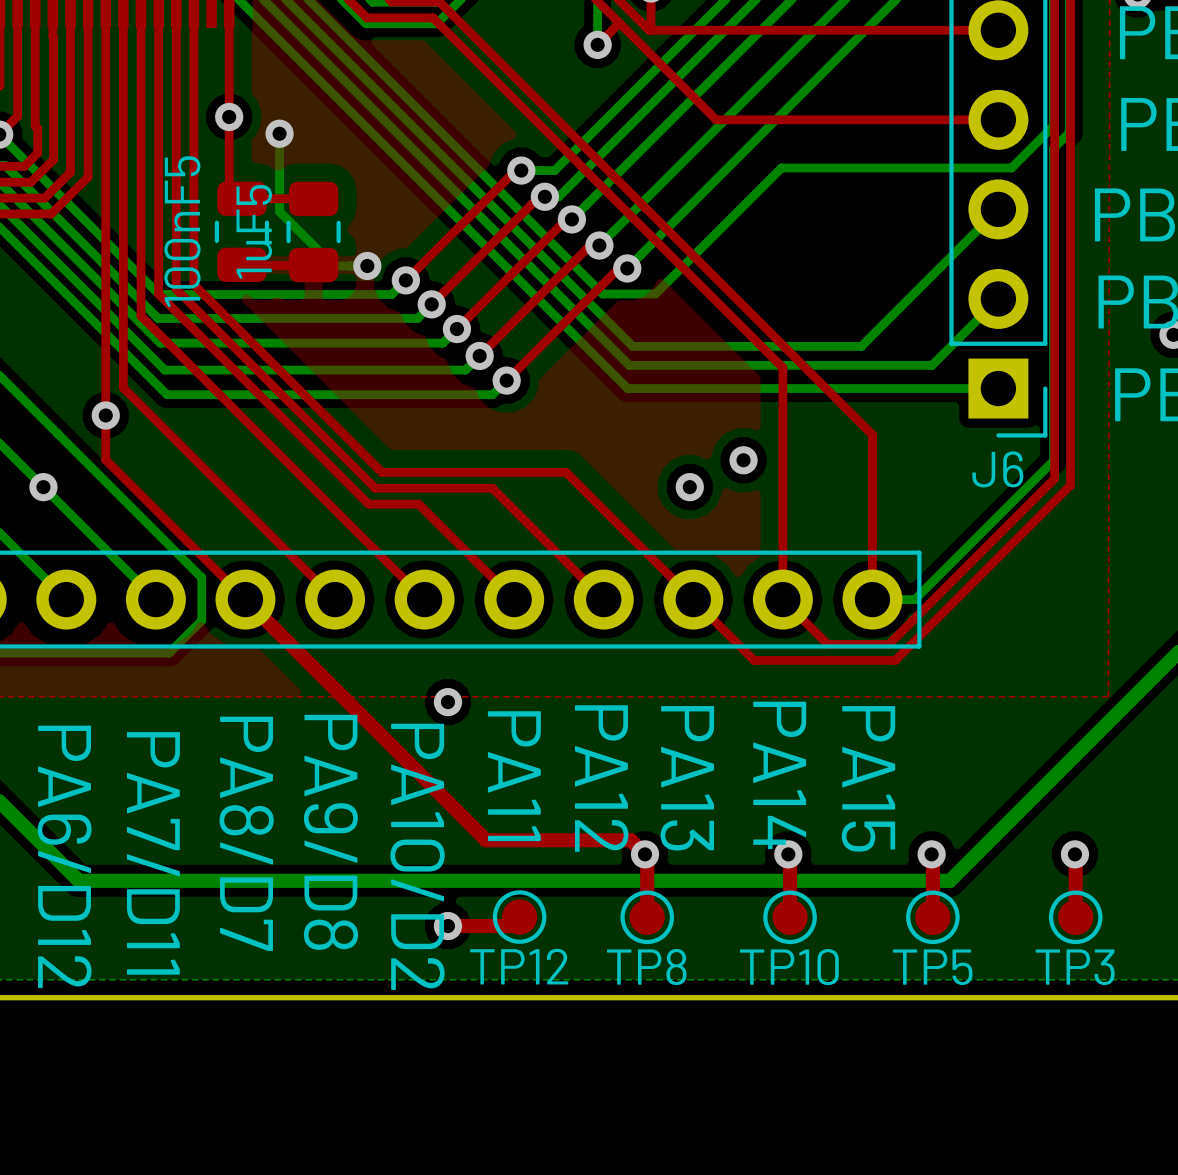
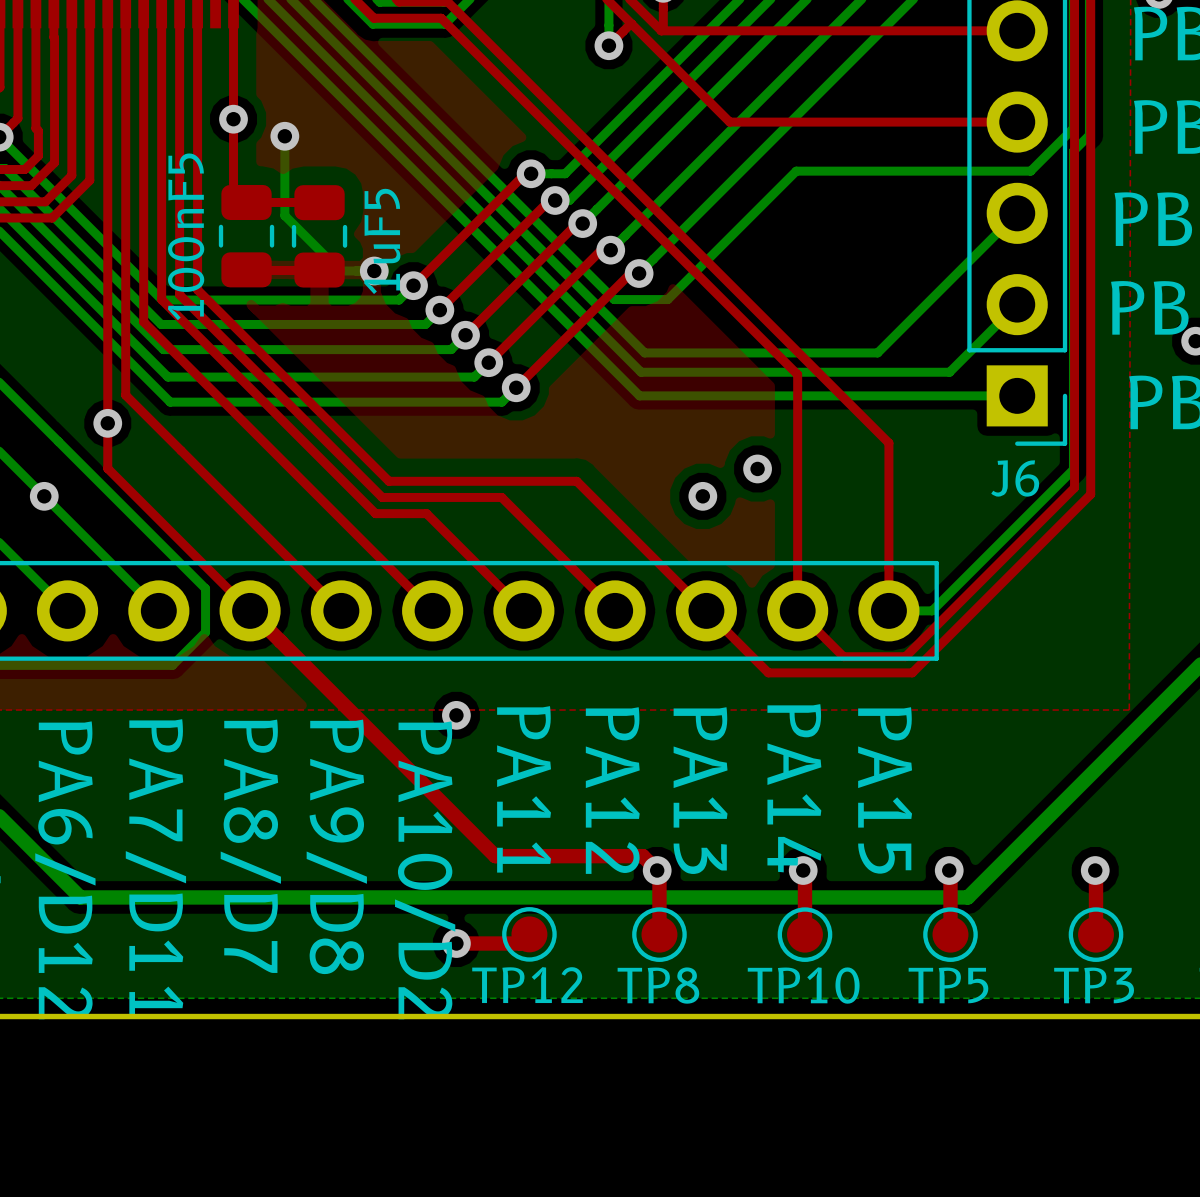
1uF5 name position: 1uF5 (254, 231) -> 1uF5 (382, 241)

